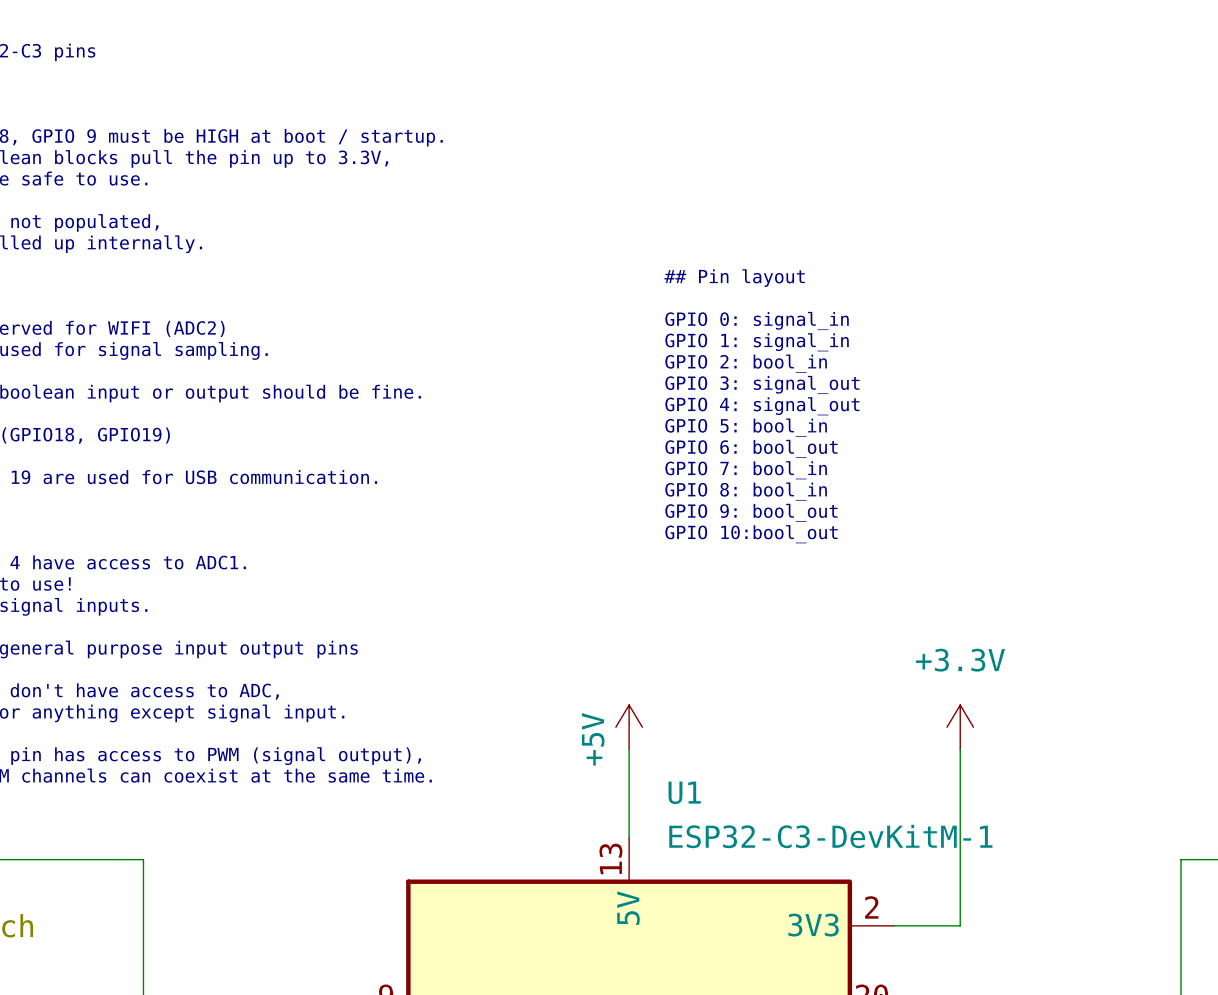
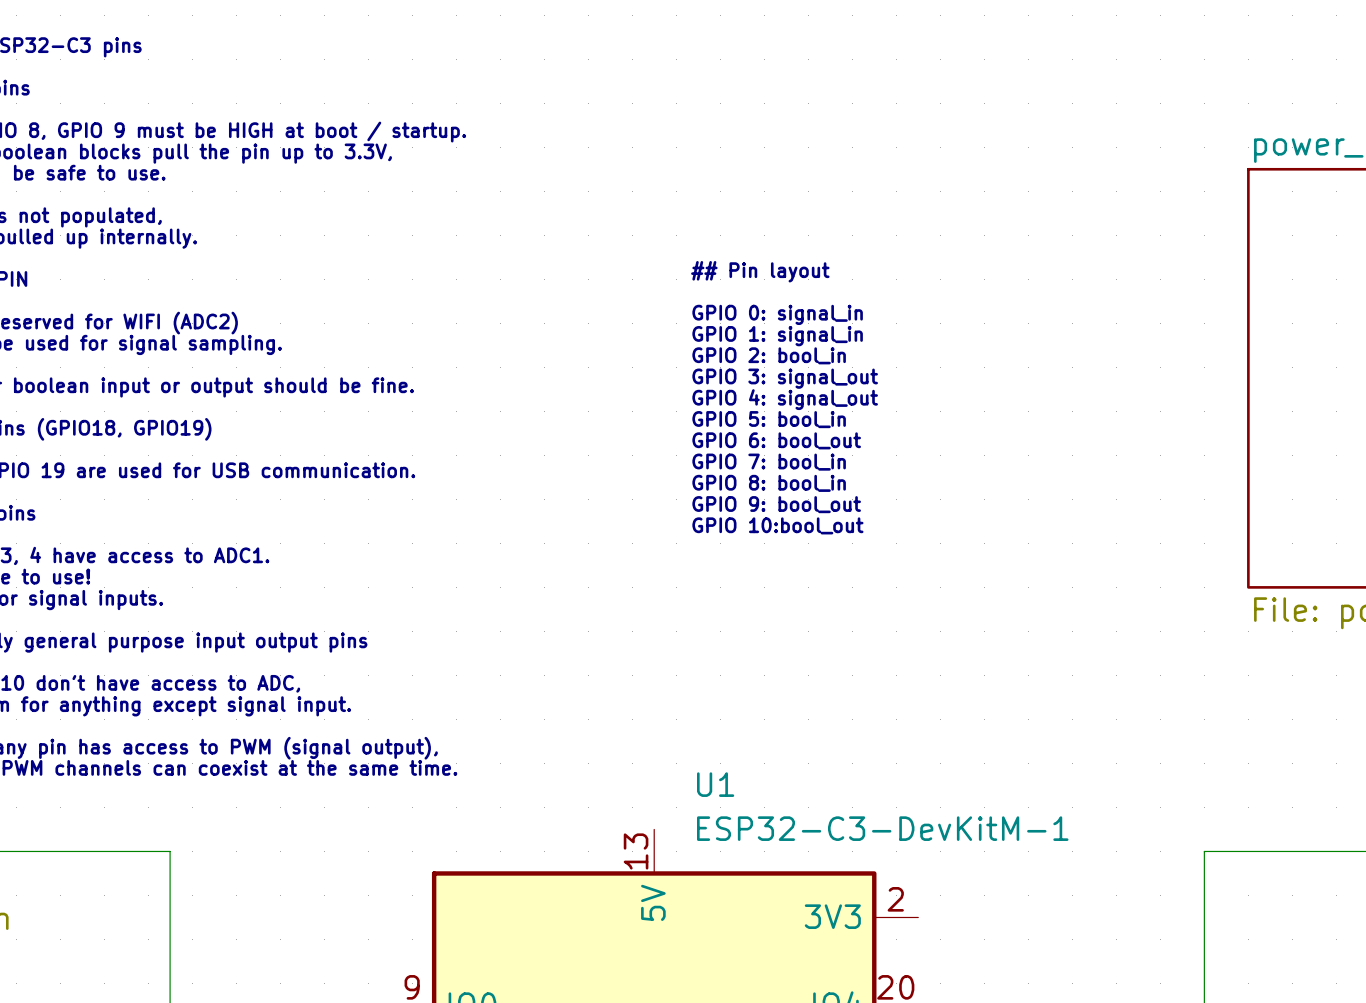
power symbol: +5V (629, 727) -> none
power symbol: +3.3V (960, 727) -> none
wire: (629, 749) (629, 837) -> none
wire: (960, 749) (960, 925) (894, 925) -> none

